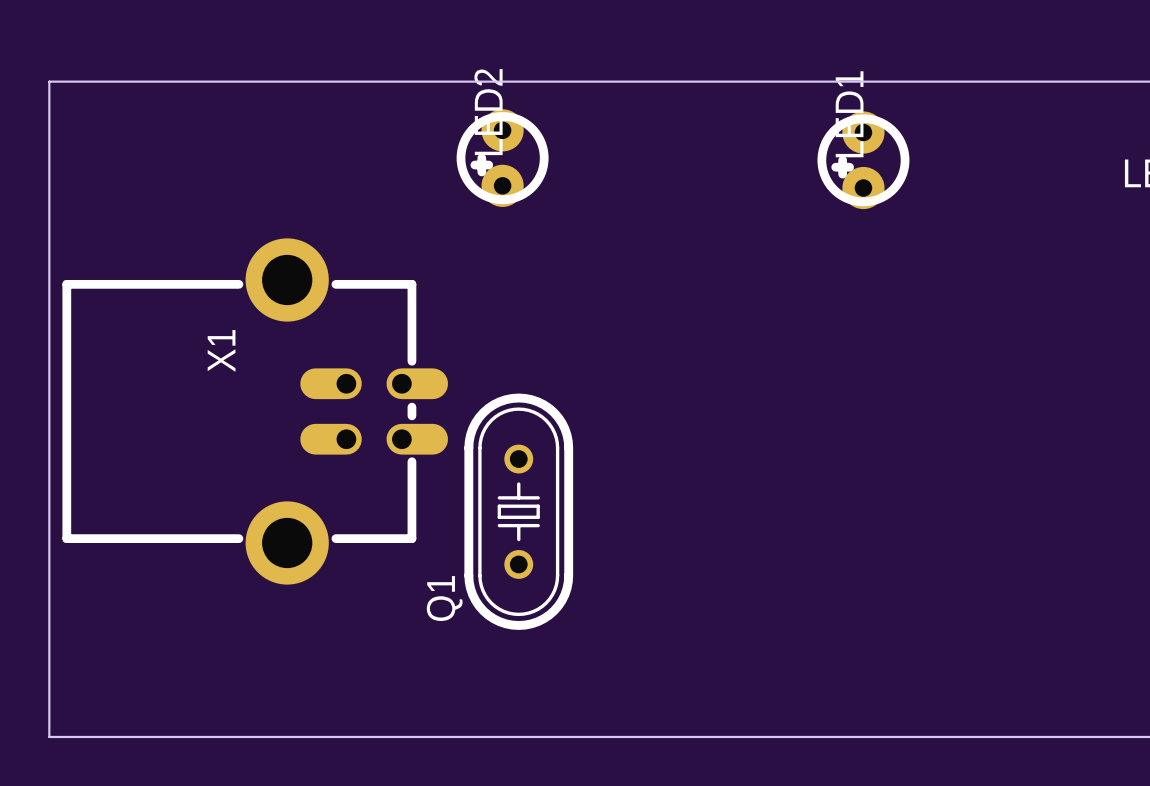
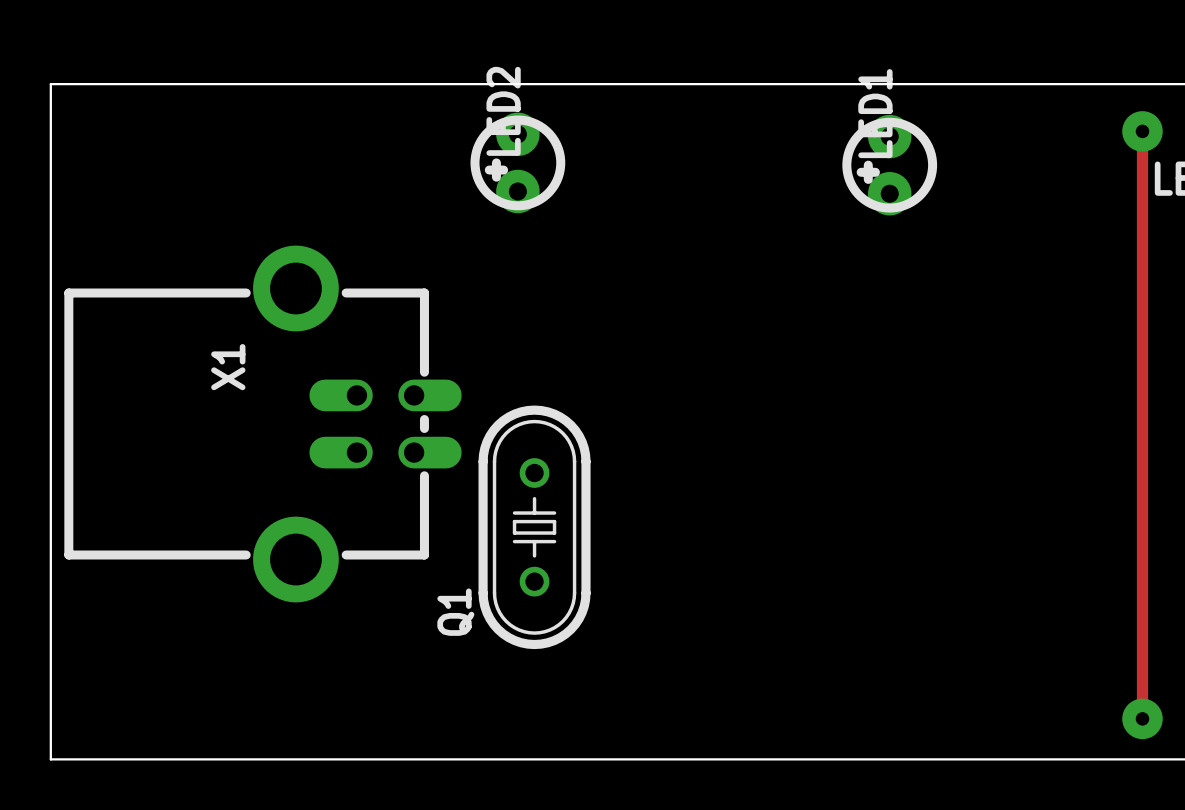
track: none -> (1142, 131) (1142, 718)
via: none -> (1142, 131)
via: none -> (1142, 718)

